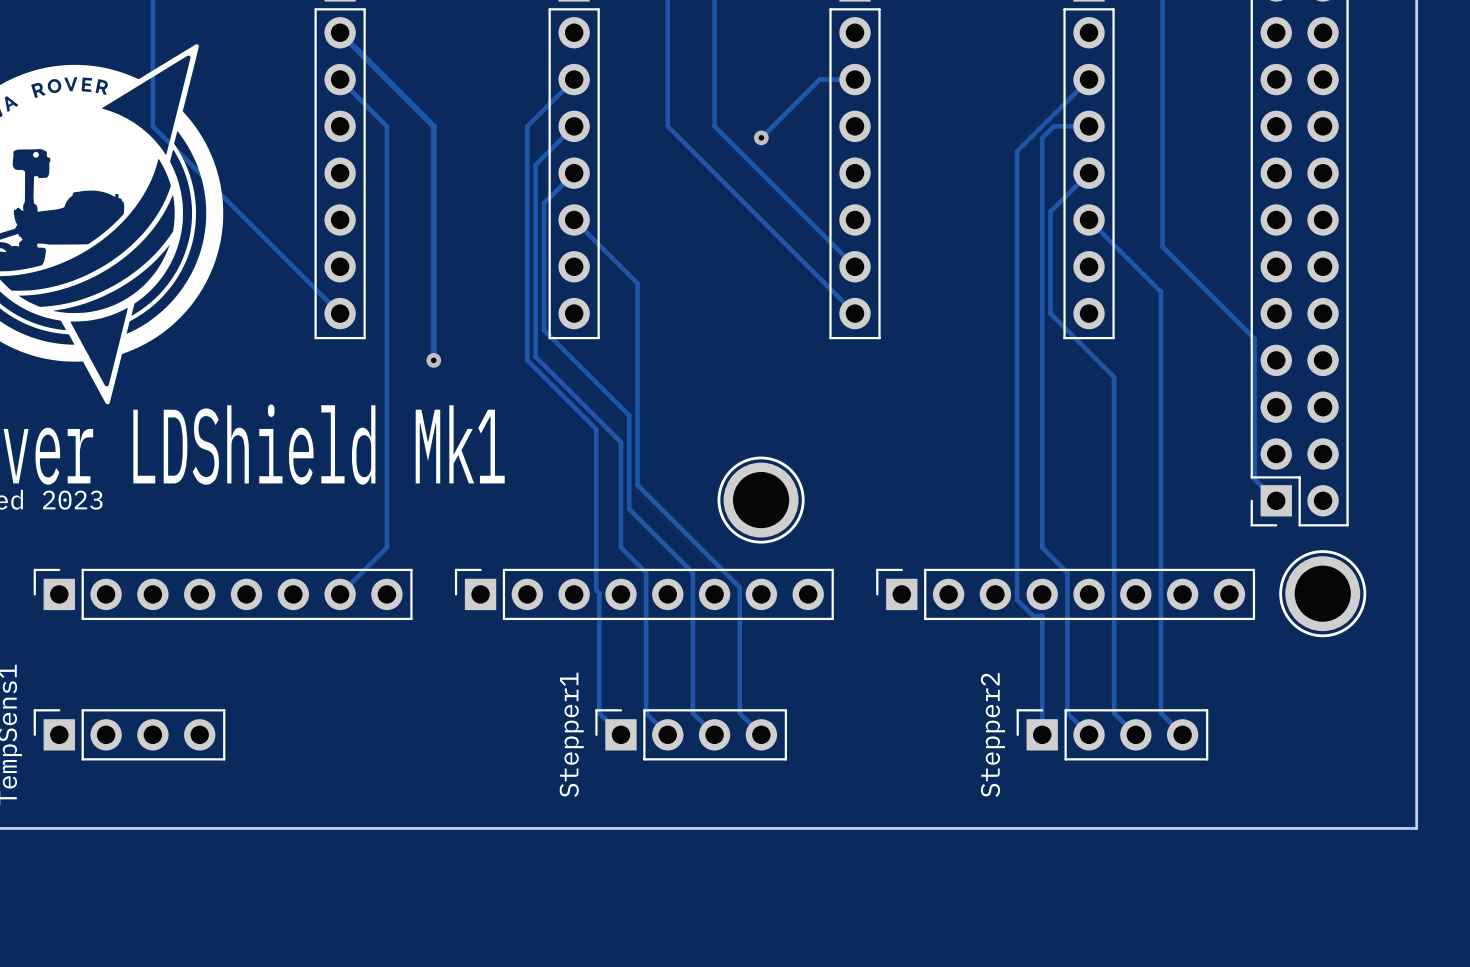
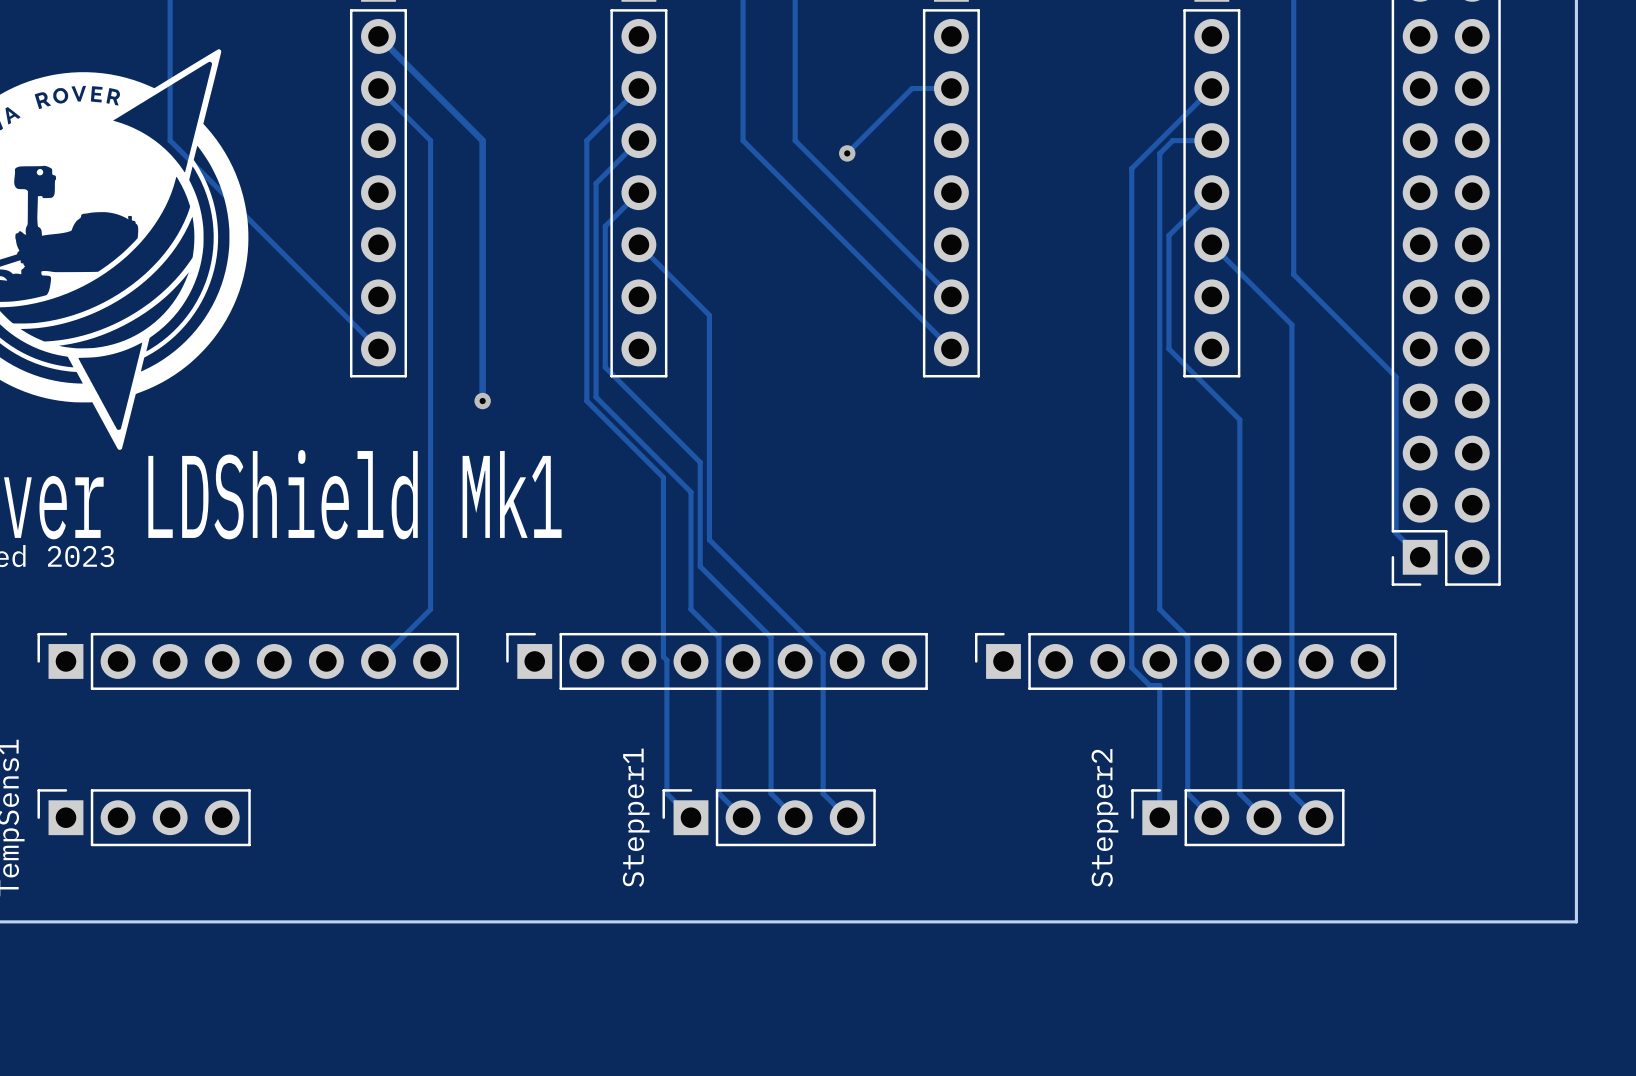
part: (761, 500) -> none
part: (1322, 593) -> none

